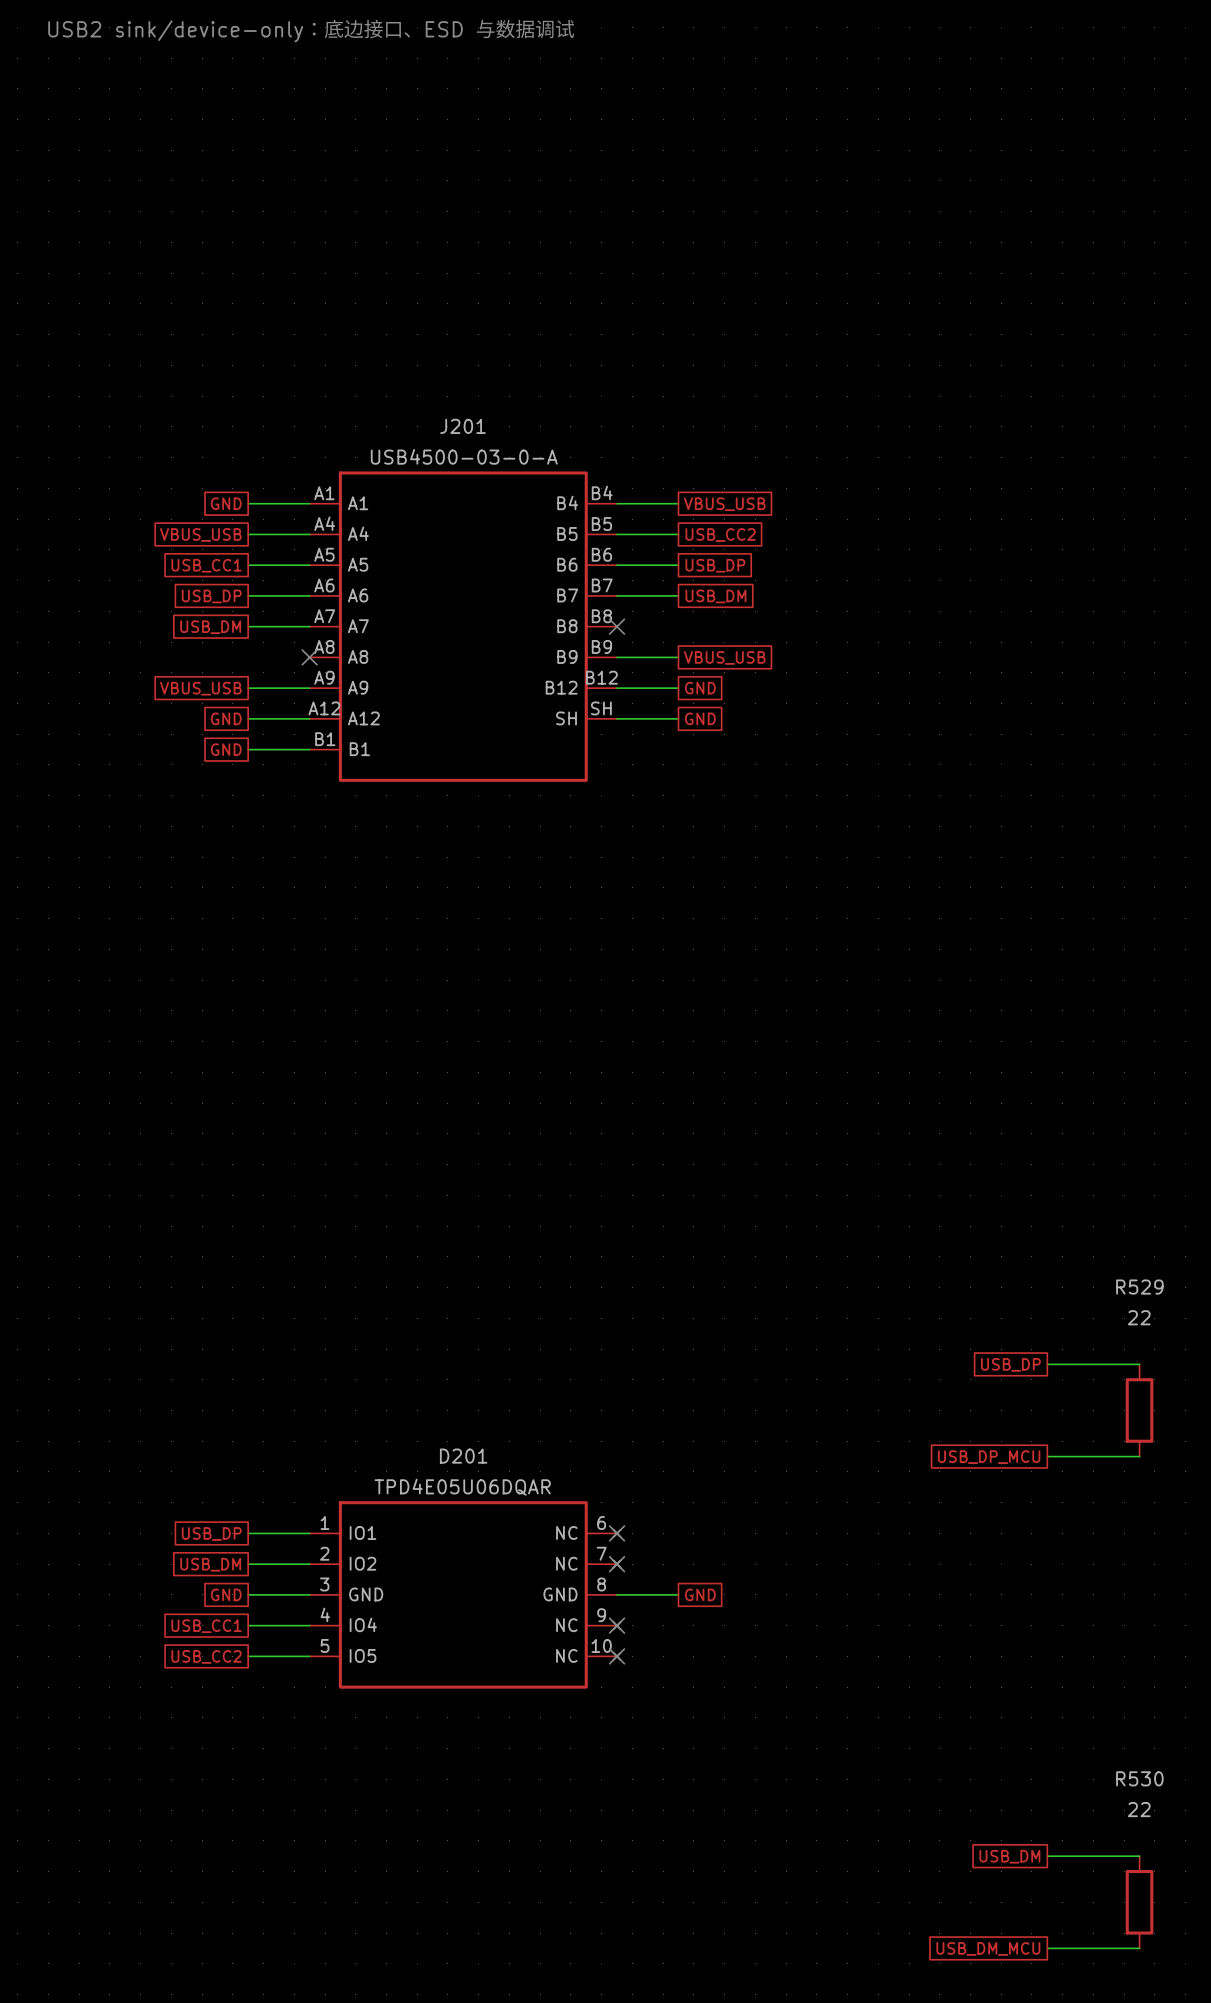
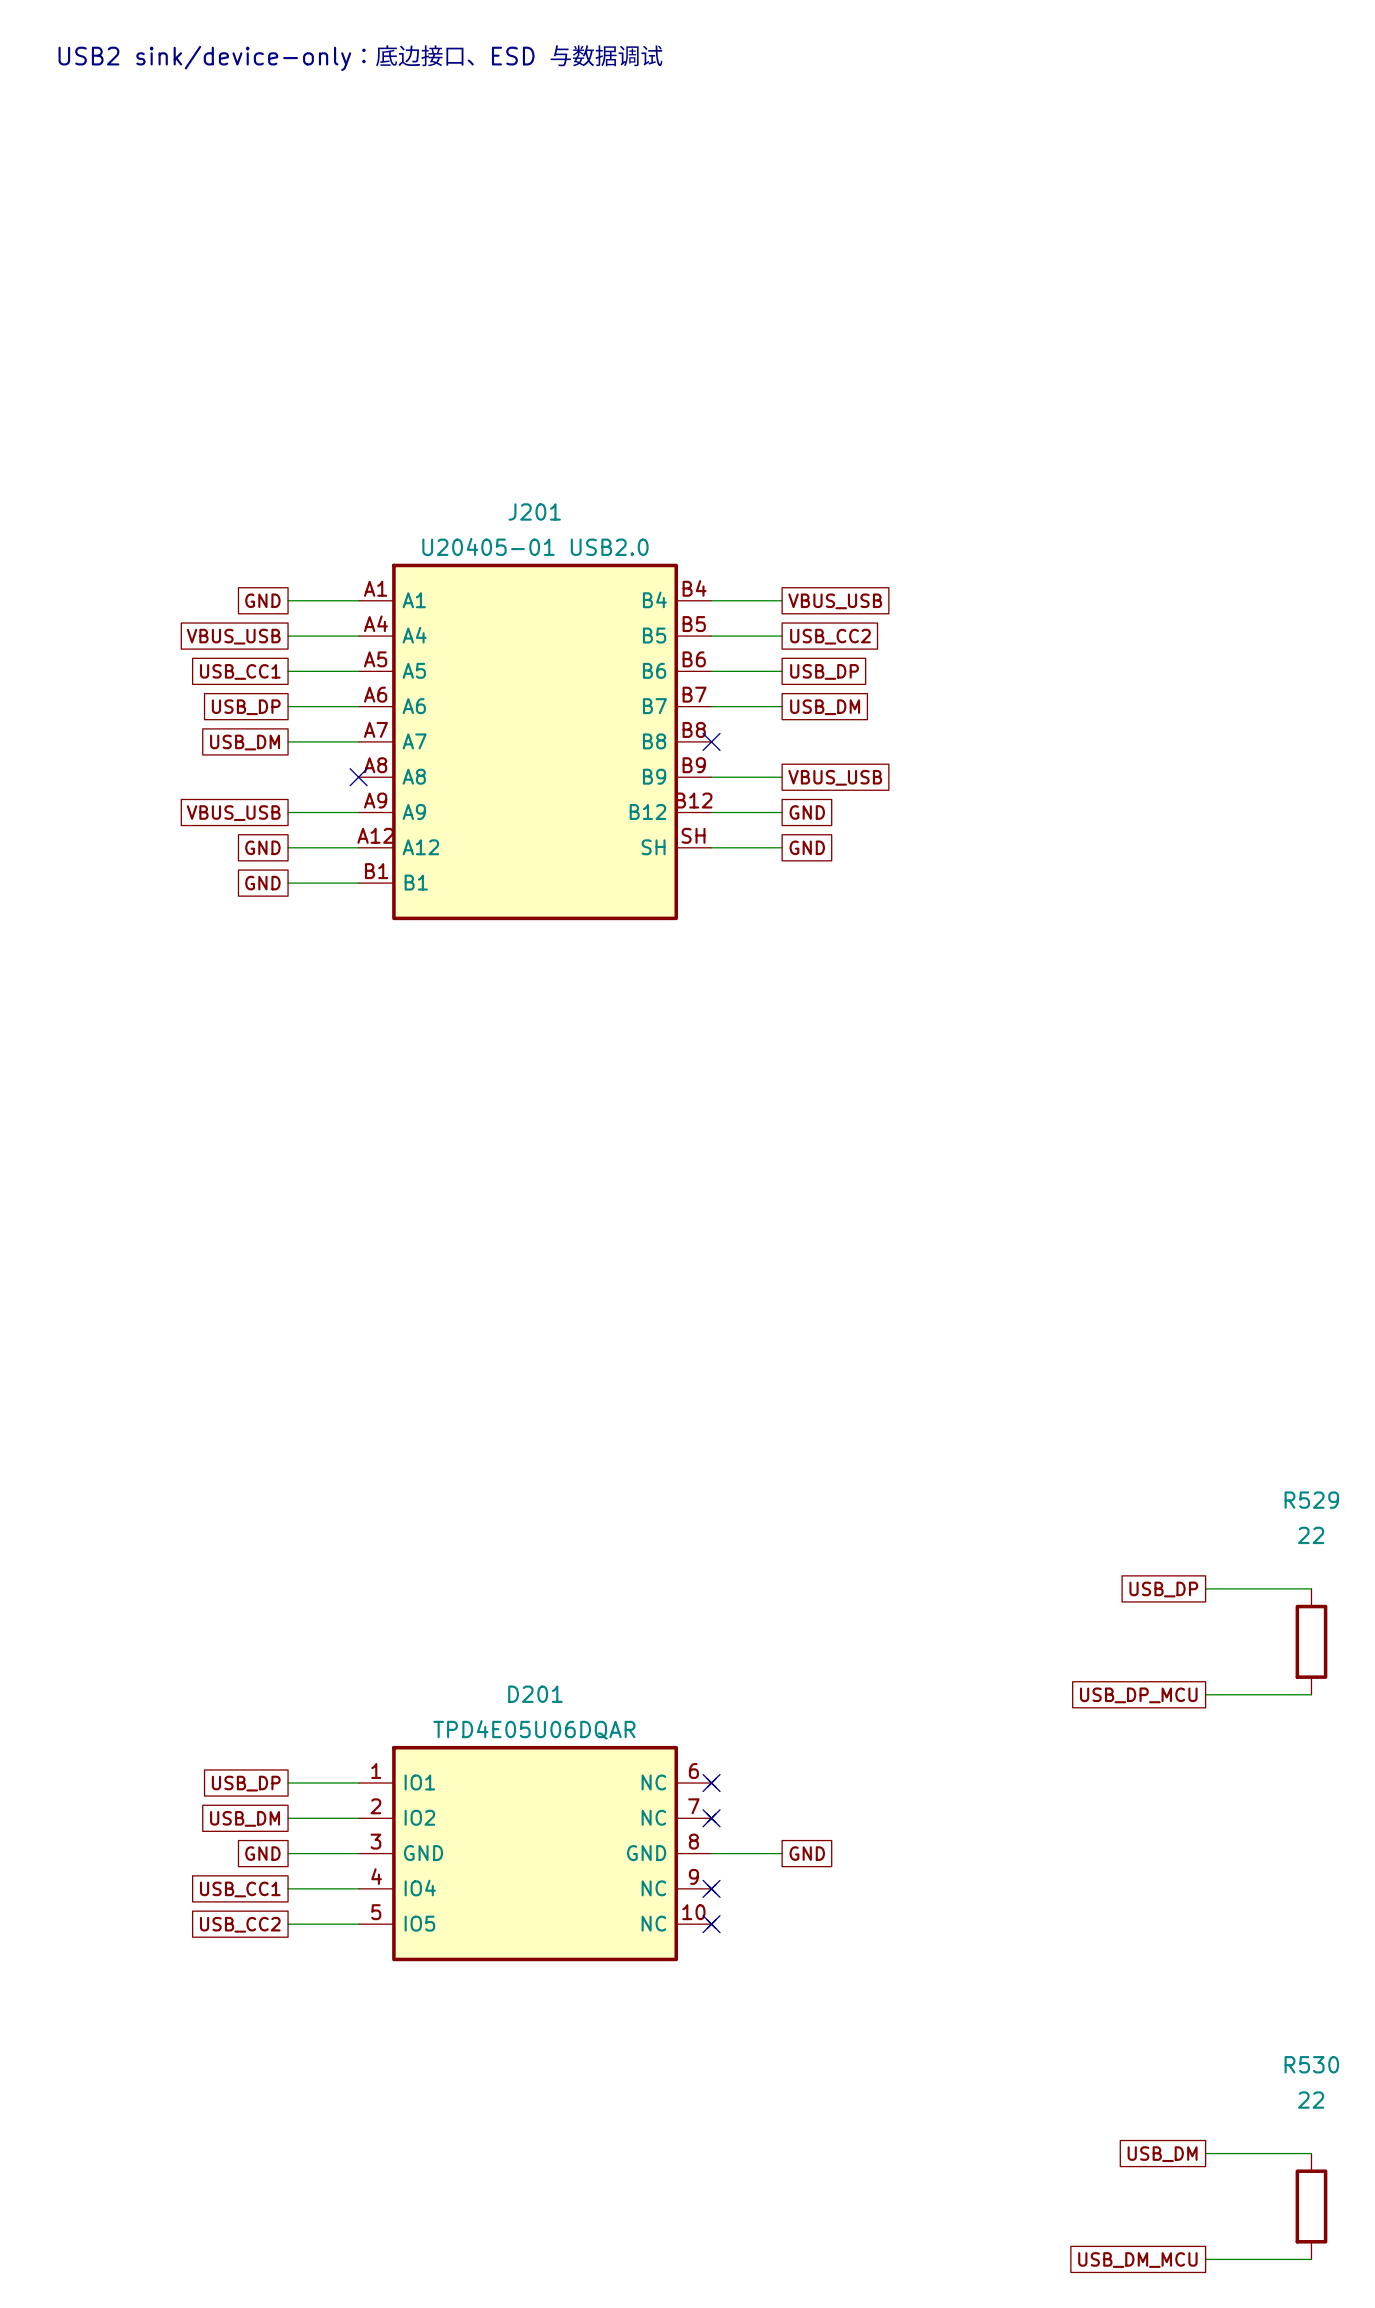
J201 value: USB4500-03-0-A (464, 456) -> U20405-01 USB2.0 (535, 546)

